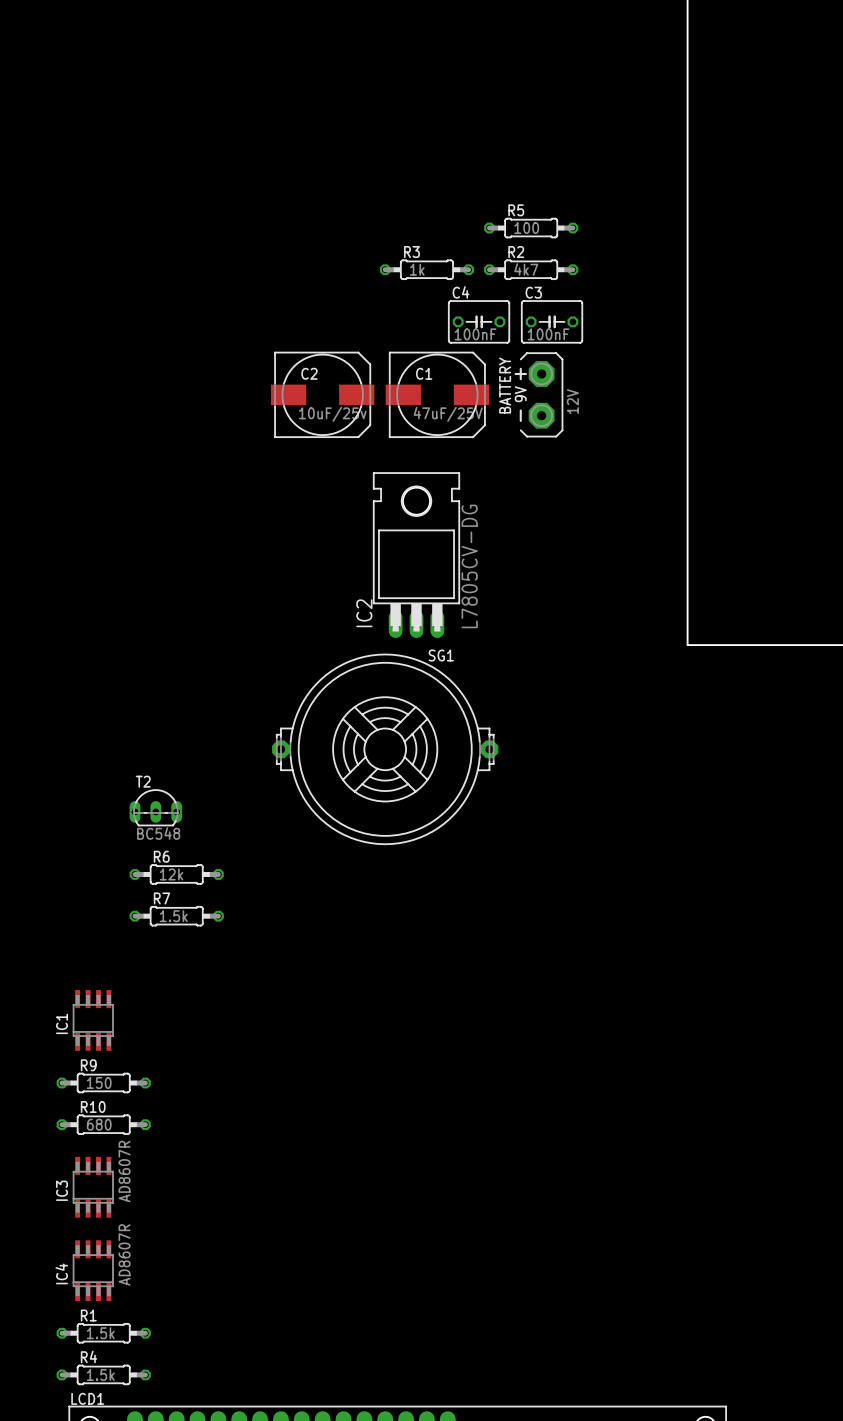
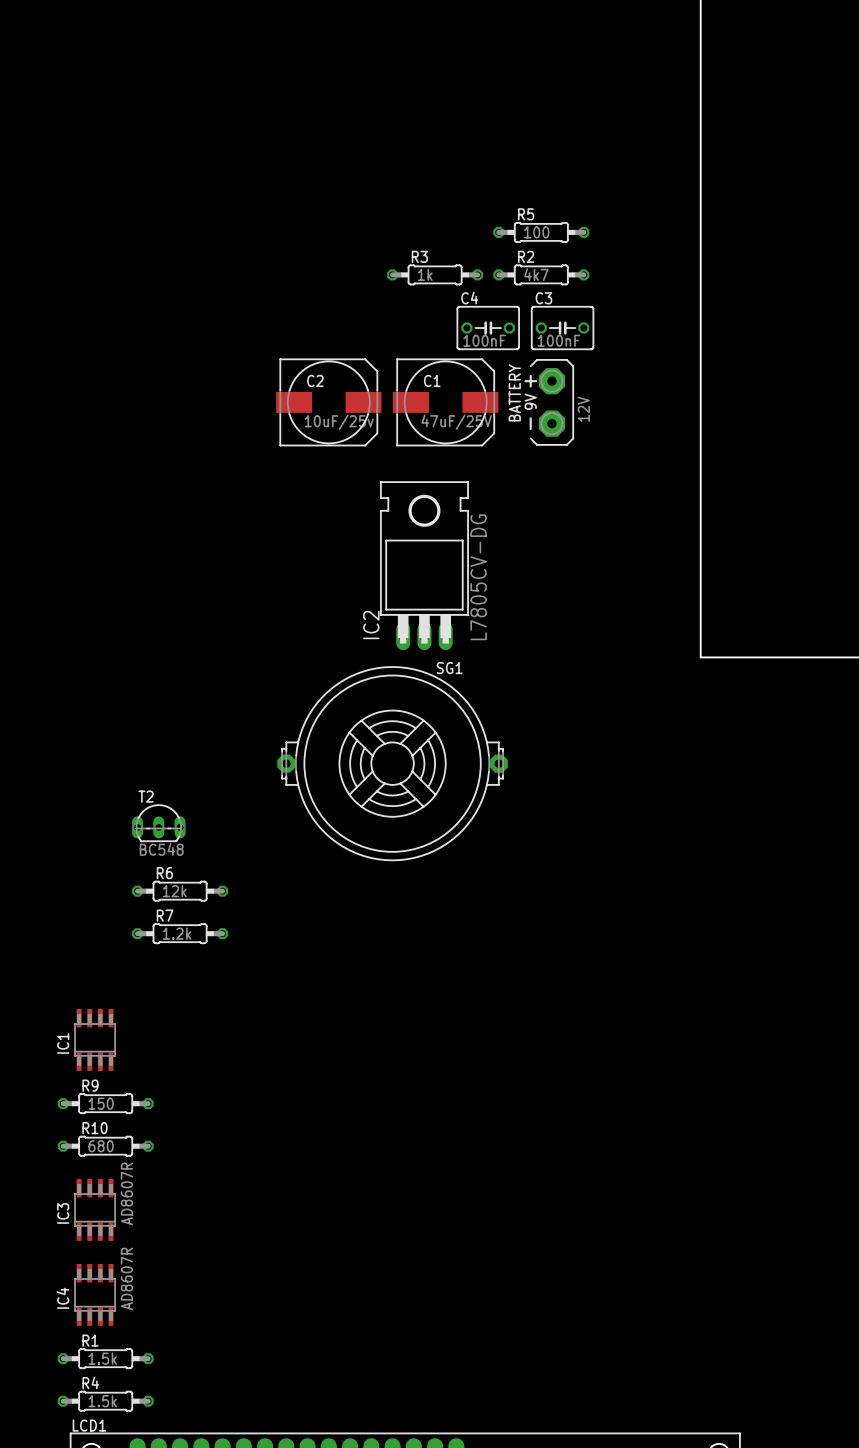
R7 value: 1.5k (173, 916) -> 1.2k (177, 933)

